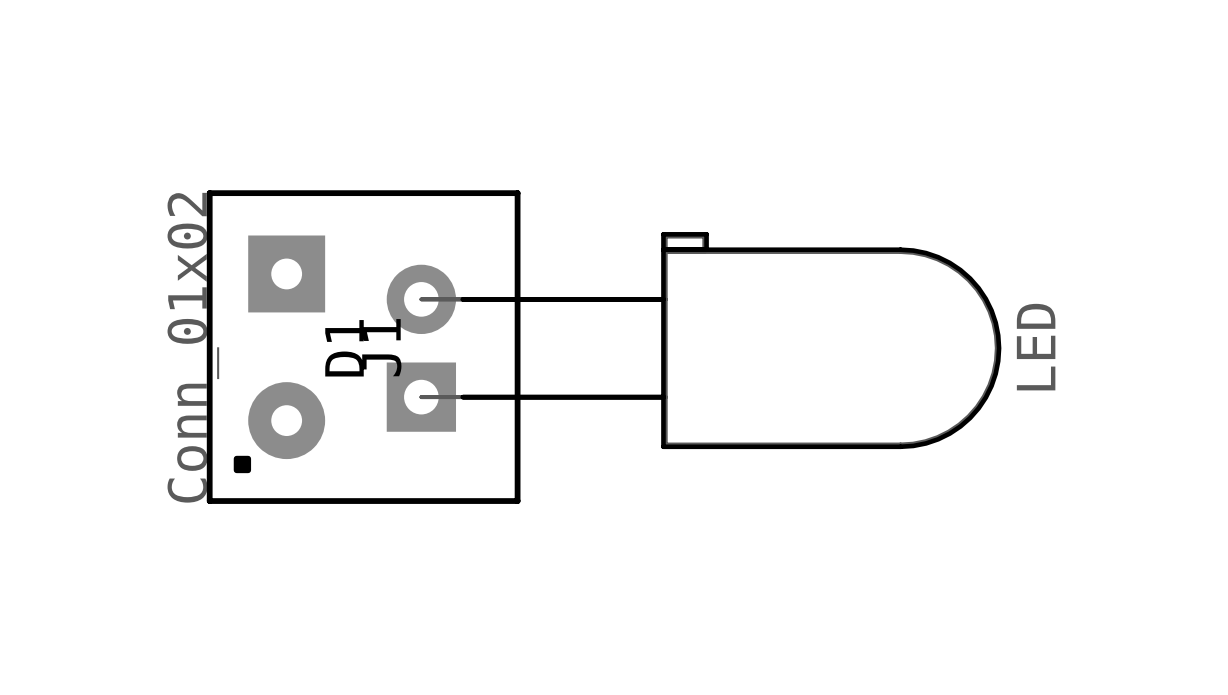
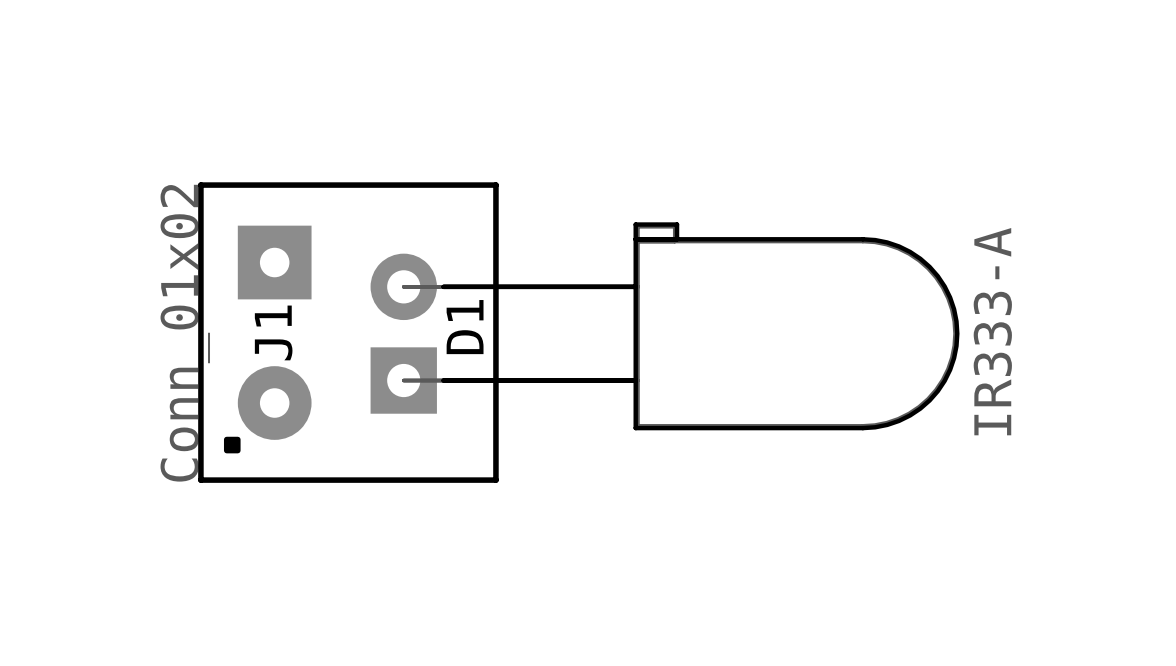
J1 name position: J1 (381, 347) -> J1 (273, 332)
D1 value: LED (1036, 347) -> IR333-A (992, 331)
D1 name position: D1 (344, 348) -> D1 (465, 327)

